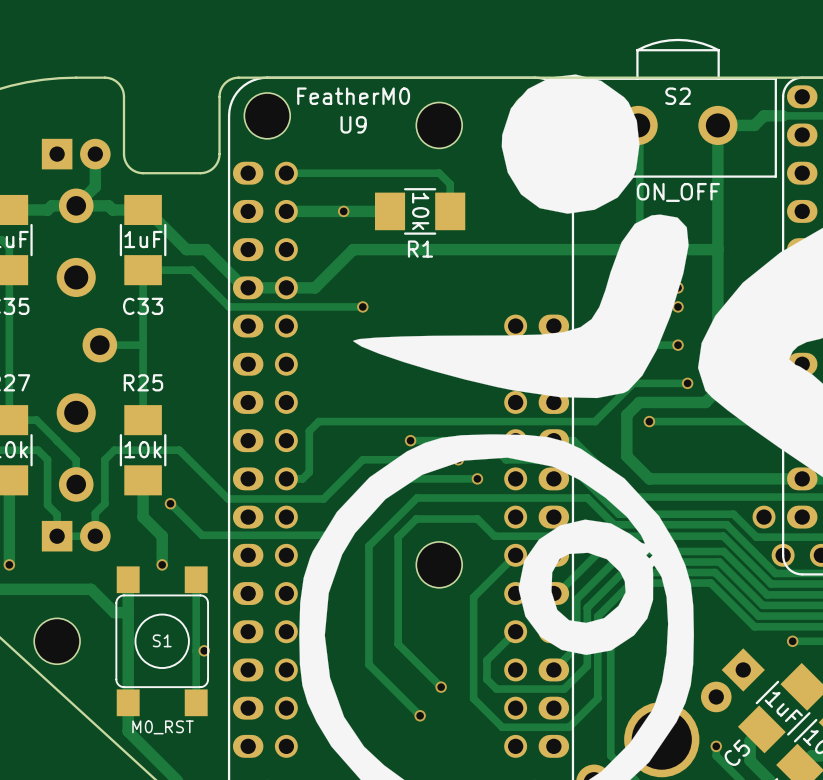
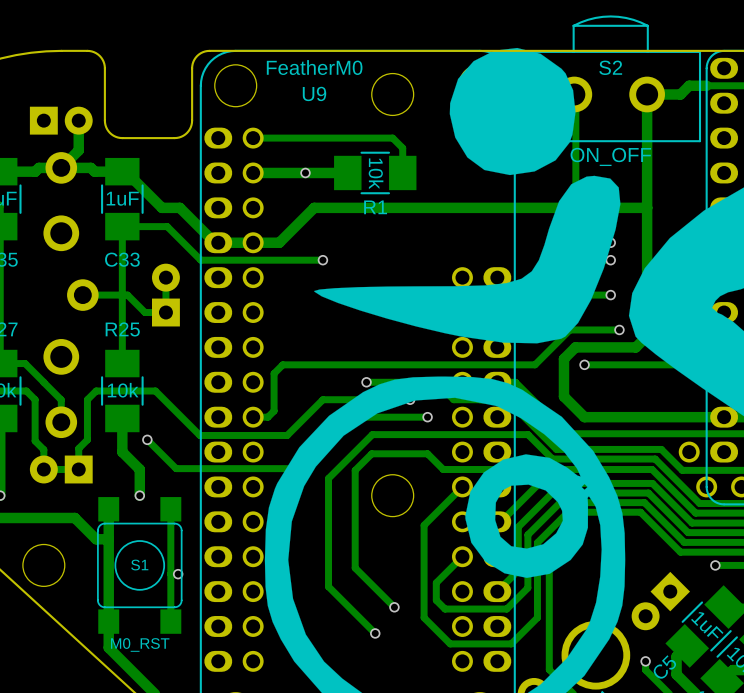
track: none -> (165, 277) (165, 312) (145, 312) (127, 295) (122, 295)
part: none -> (165, 295)
part rotation: 0° (76, 536) -> 180° (61, 469)

